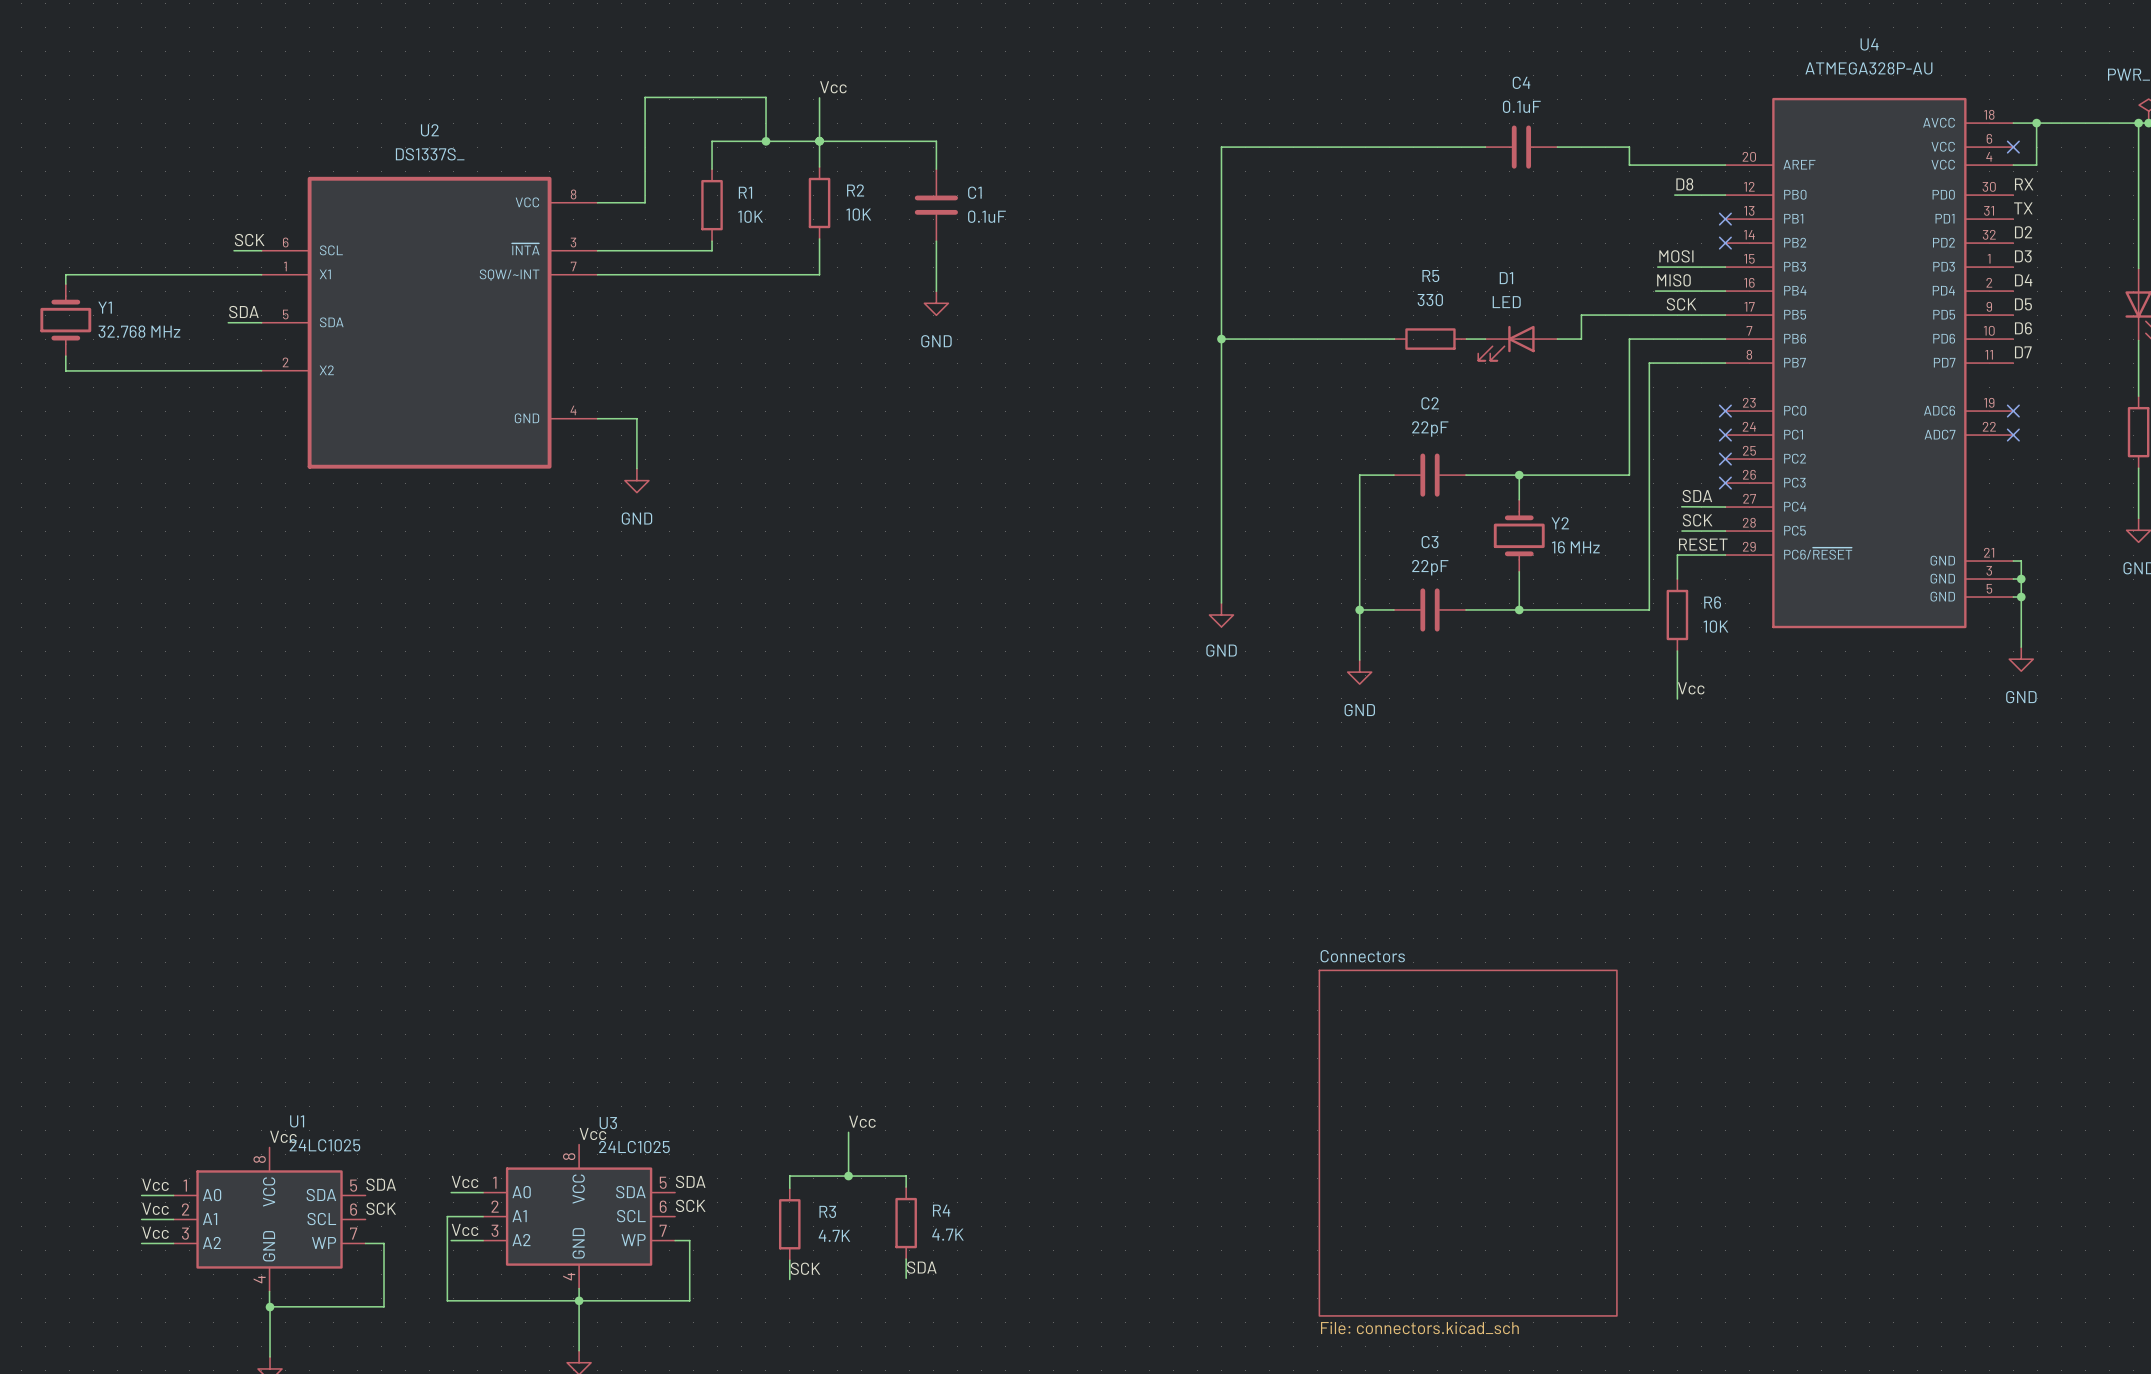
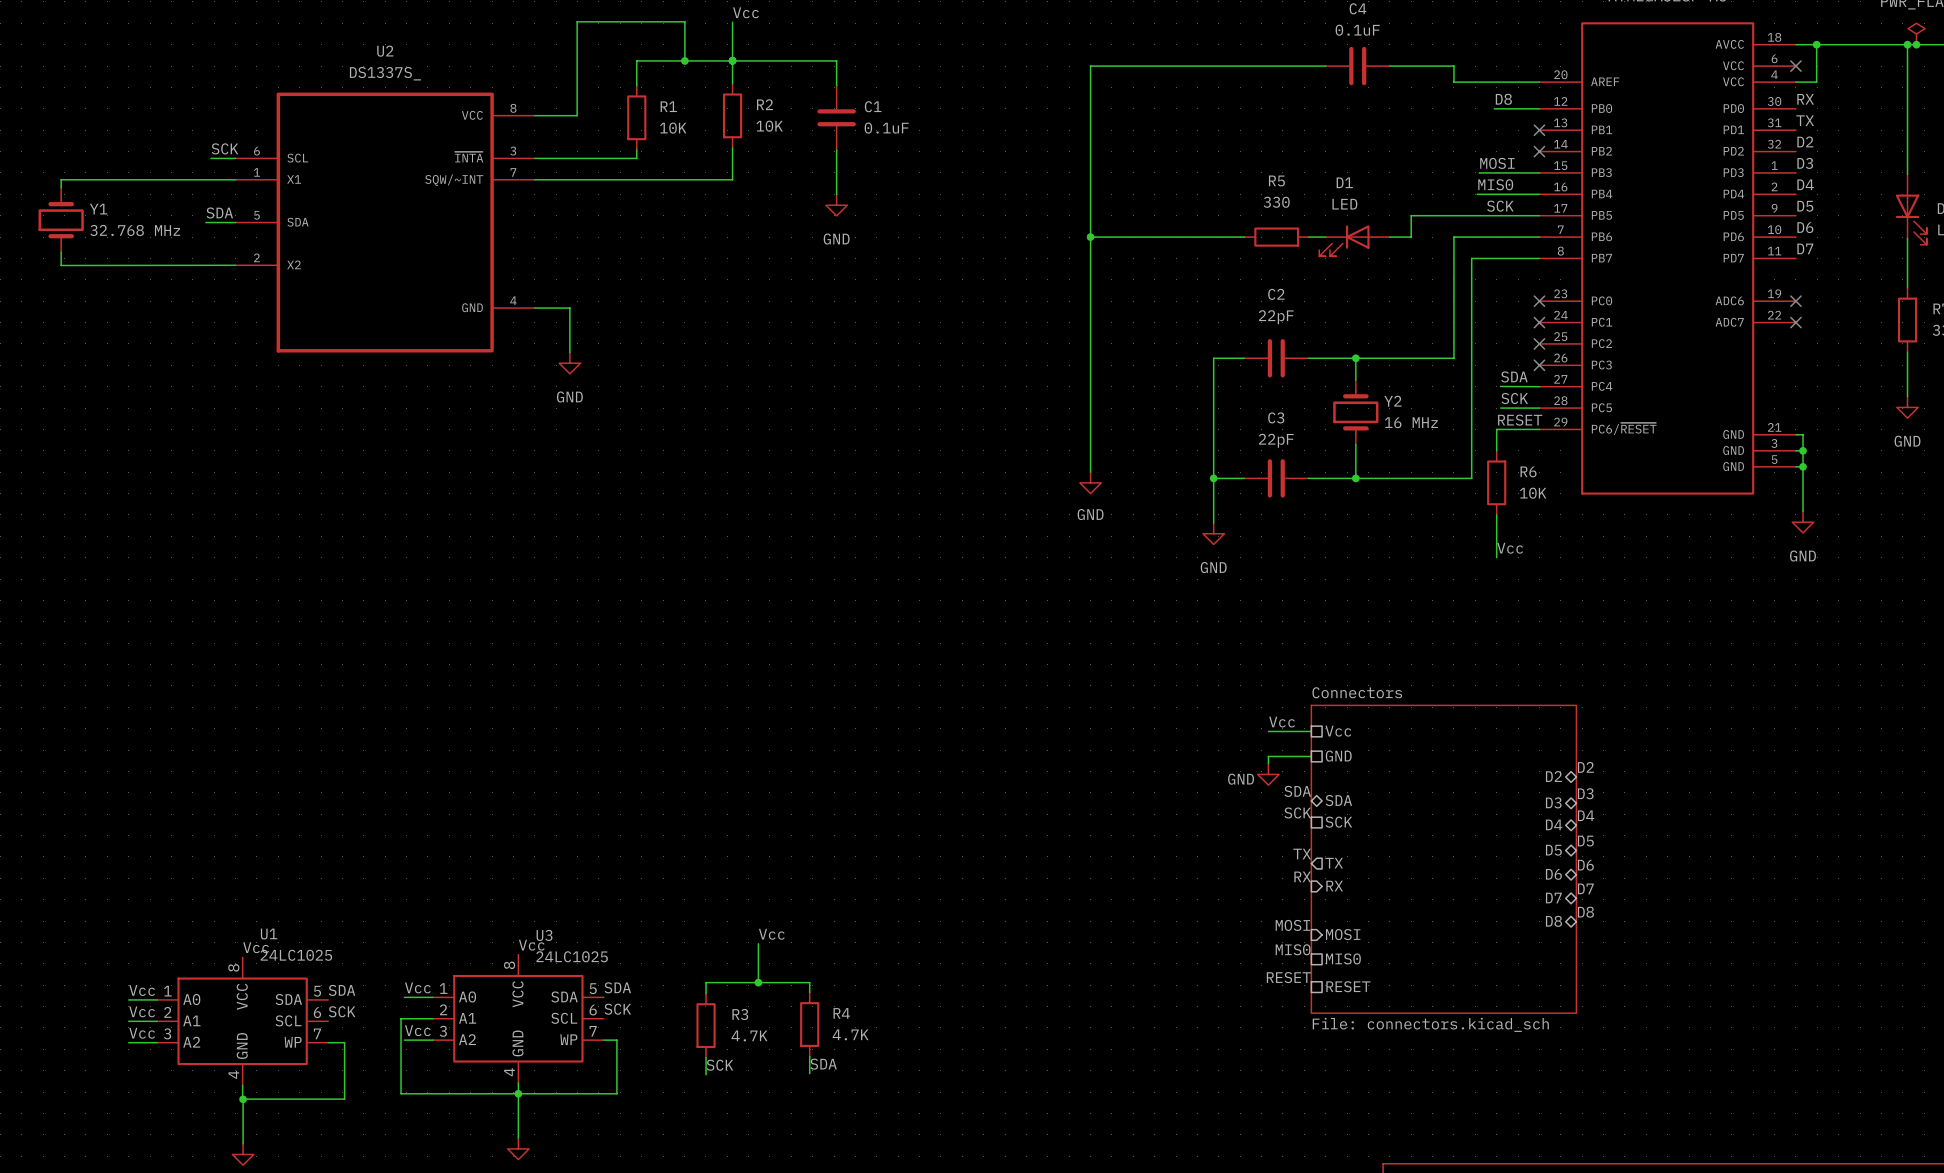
label: none -> Vcc (1282, 722)
sheet pin: none -> Vcc (1338, 731)
wire: none -> (1268, 731) (1311, 731)
sheet pin: none -> GND (1338, 756)
wire: none -> (1311, 756) (1268, 756) (1268, 763)
label: none -> D2 (1585, 767)
power symbol: none -> GND (1268, 774)
sheet pin: none -> D2 (1553, 776)
label: none -> SDA (1297, 791)
label: none -> D3 (1585, 793)
sheet pin: none -> SDA (1338, 800)
sheet pin: none -> D3 (1553, 802)
label: none -> SCK (1297, 812)
label: none -> D4 (1586, 815)
sheet pin: none -> SCK (1338, 822)
sheet pin: none -> D4 (1554, 824)
label: none -> D5 (1585, 841)
sheet pin: none -> D5 (1553, 850)
label: none -> TX (1302, 854)
sheet pin: none -> TX (1334, 863)
label: none -> D6 (1585, 865)
sheet pin: none -> D6 (1553, 874)
label: none -> RX (1302, 876)
sheet pin: none -> RX (1334, 886)
label: none -> D7 (1585, 888)
sheet pin: none -> D7 (1553, 898)
label: none -> D8 (1585, 912)
sheet pin: none -> D8 (1553, 921)
label: none -> MOSI (1292, 925)
sheet pin: none -> MOSI (1343, 934)
label: none -> MIS0 (1293, 949)
sheet Connectors position: (1468, 1143) -> (1443, 859)
sheet pin: none -> MIS0 (1343, 958)
label: none -> RESET (1288, 977)
sheet pin: none -> RESET (1348, 986)

